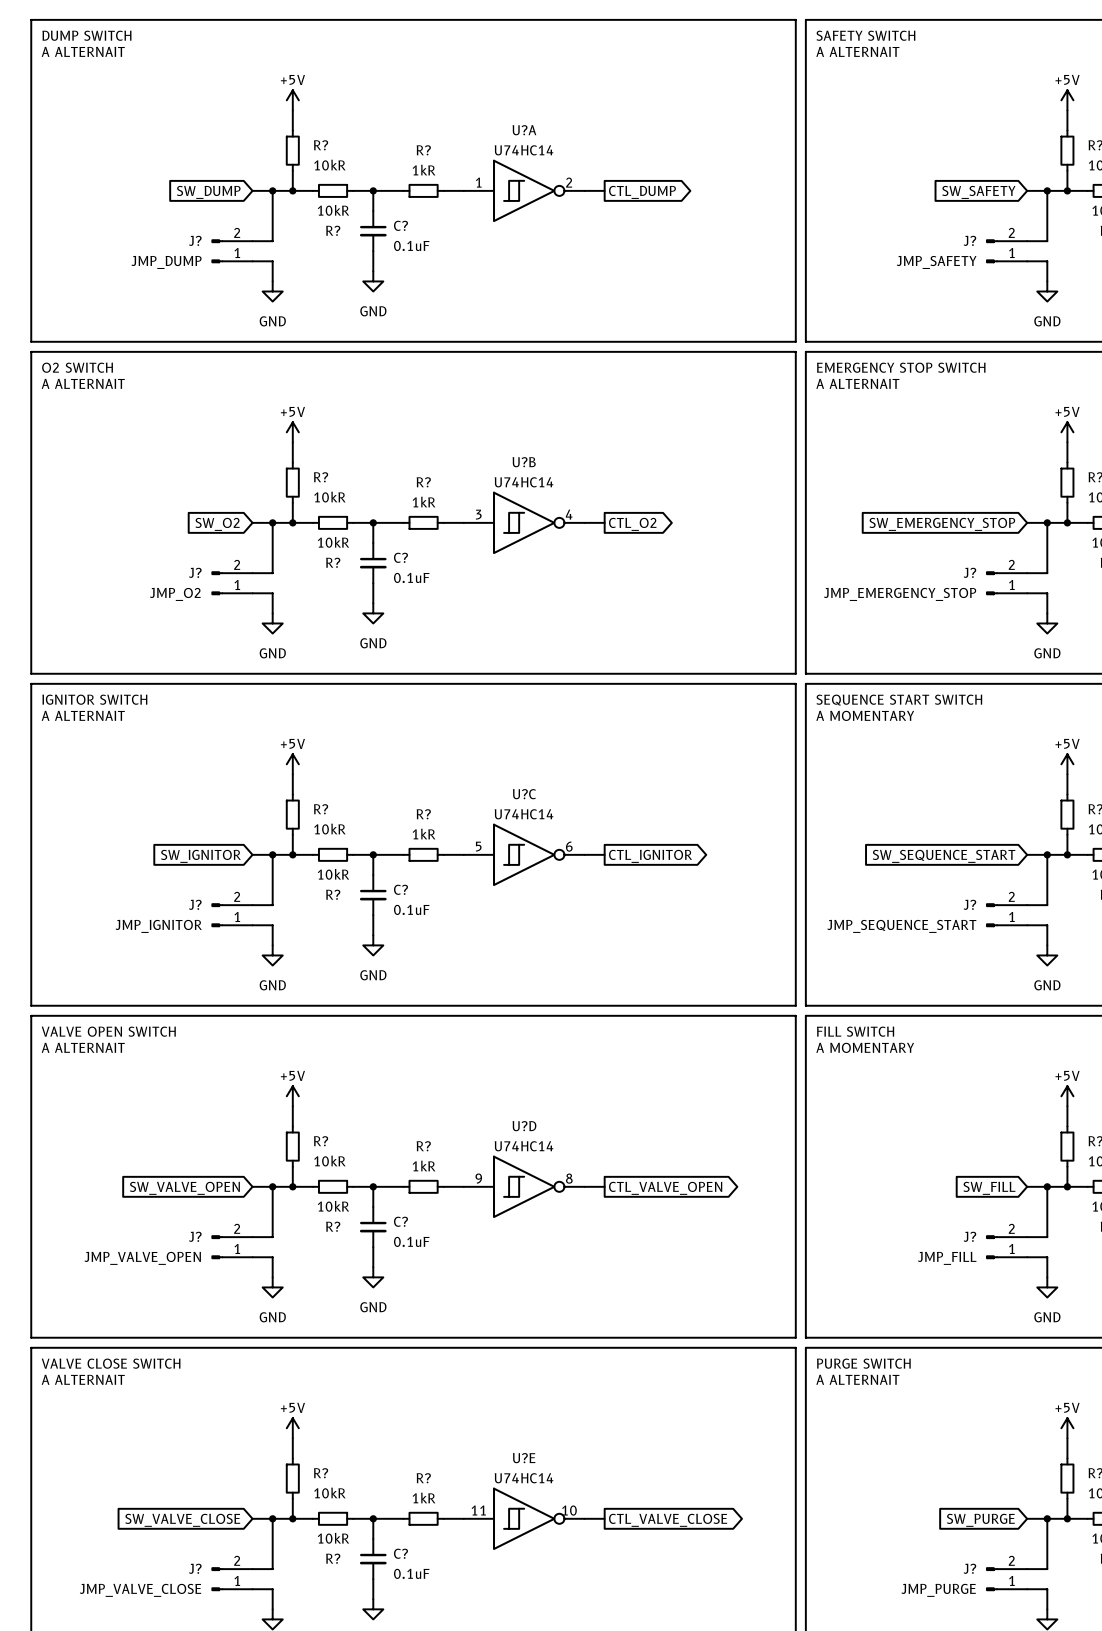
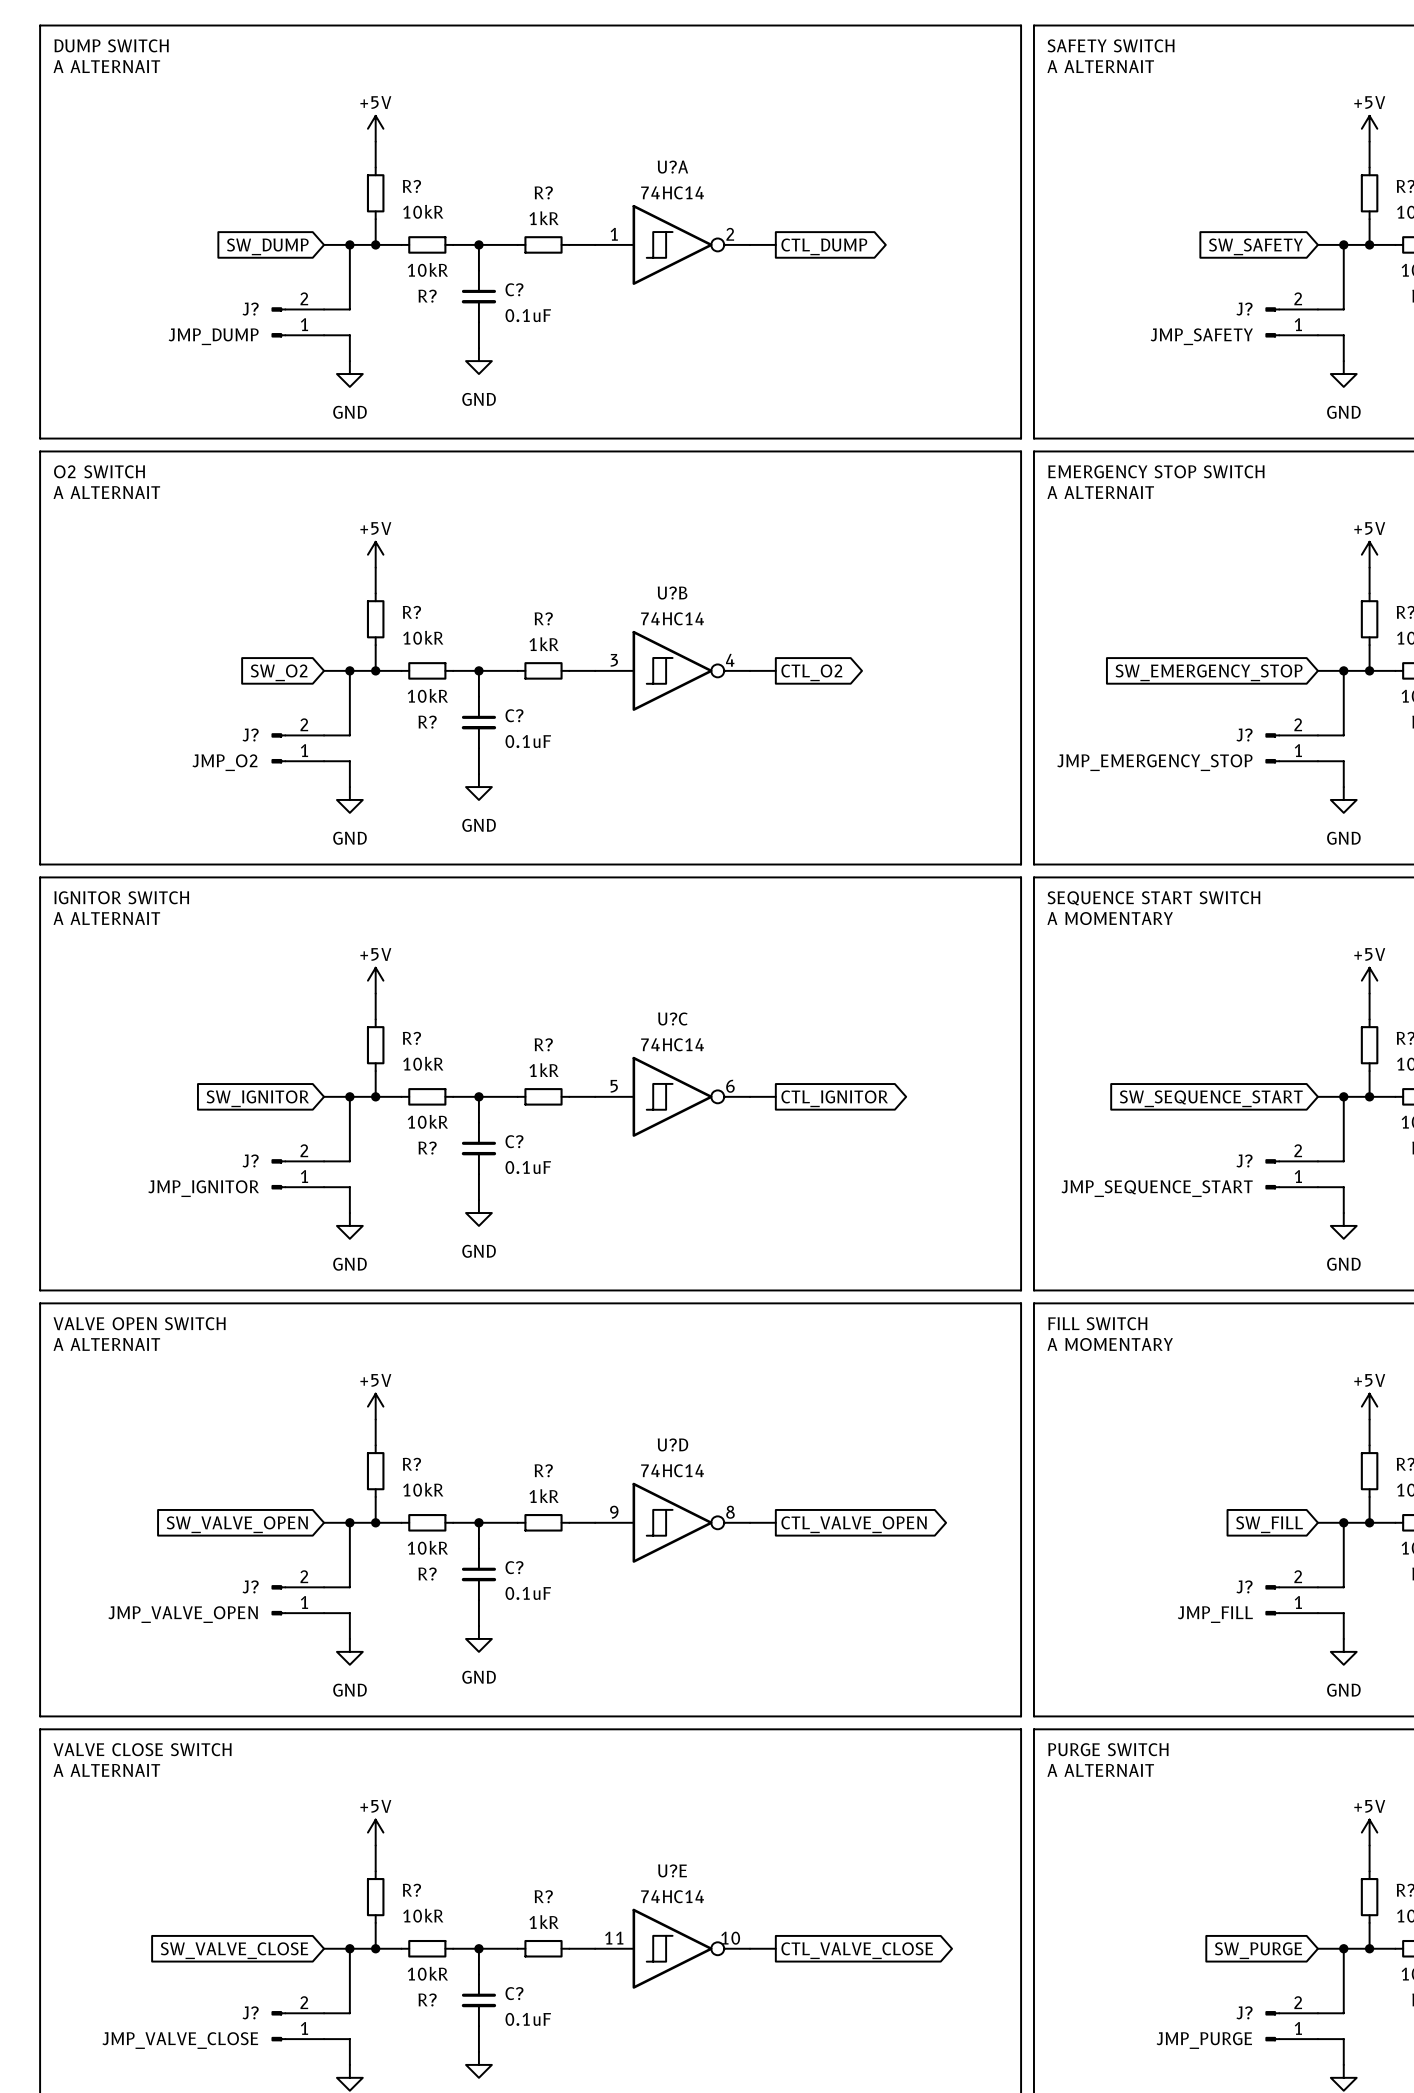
U?A value: U74HC14 (524, 150) -> 74HC14 (672, 192)
U?B value: U74HC14 (524, 482) -> 74HC14 (672, 618)
U?C value: U74HC14 (524, 814) -> 74HC14 (672, 1044)
U?D value: U74HC14 (524, 1146) -> 74HC14 (672, 1470)
U?E value: U74HC14 (524, 1478) -> 74HC14 (672, 1896)

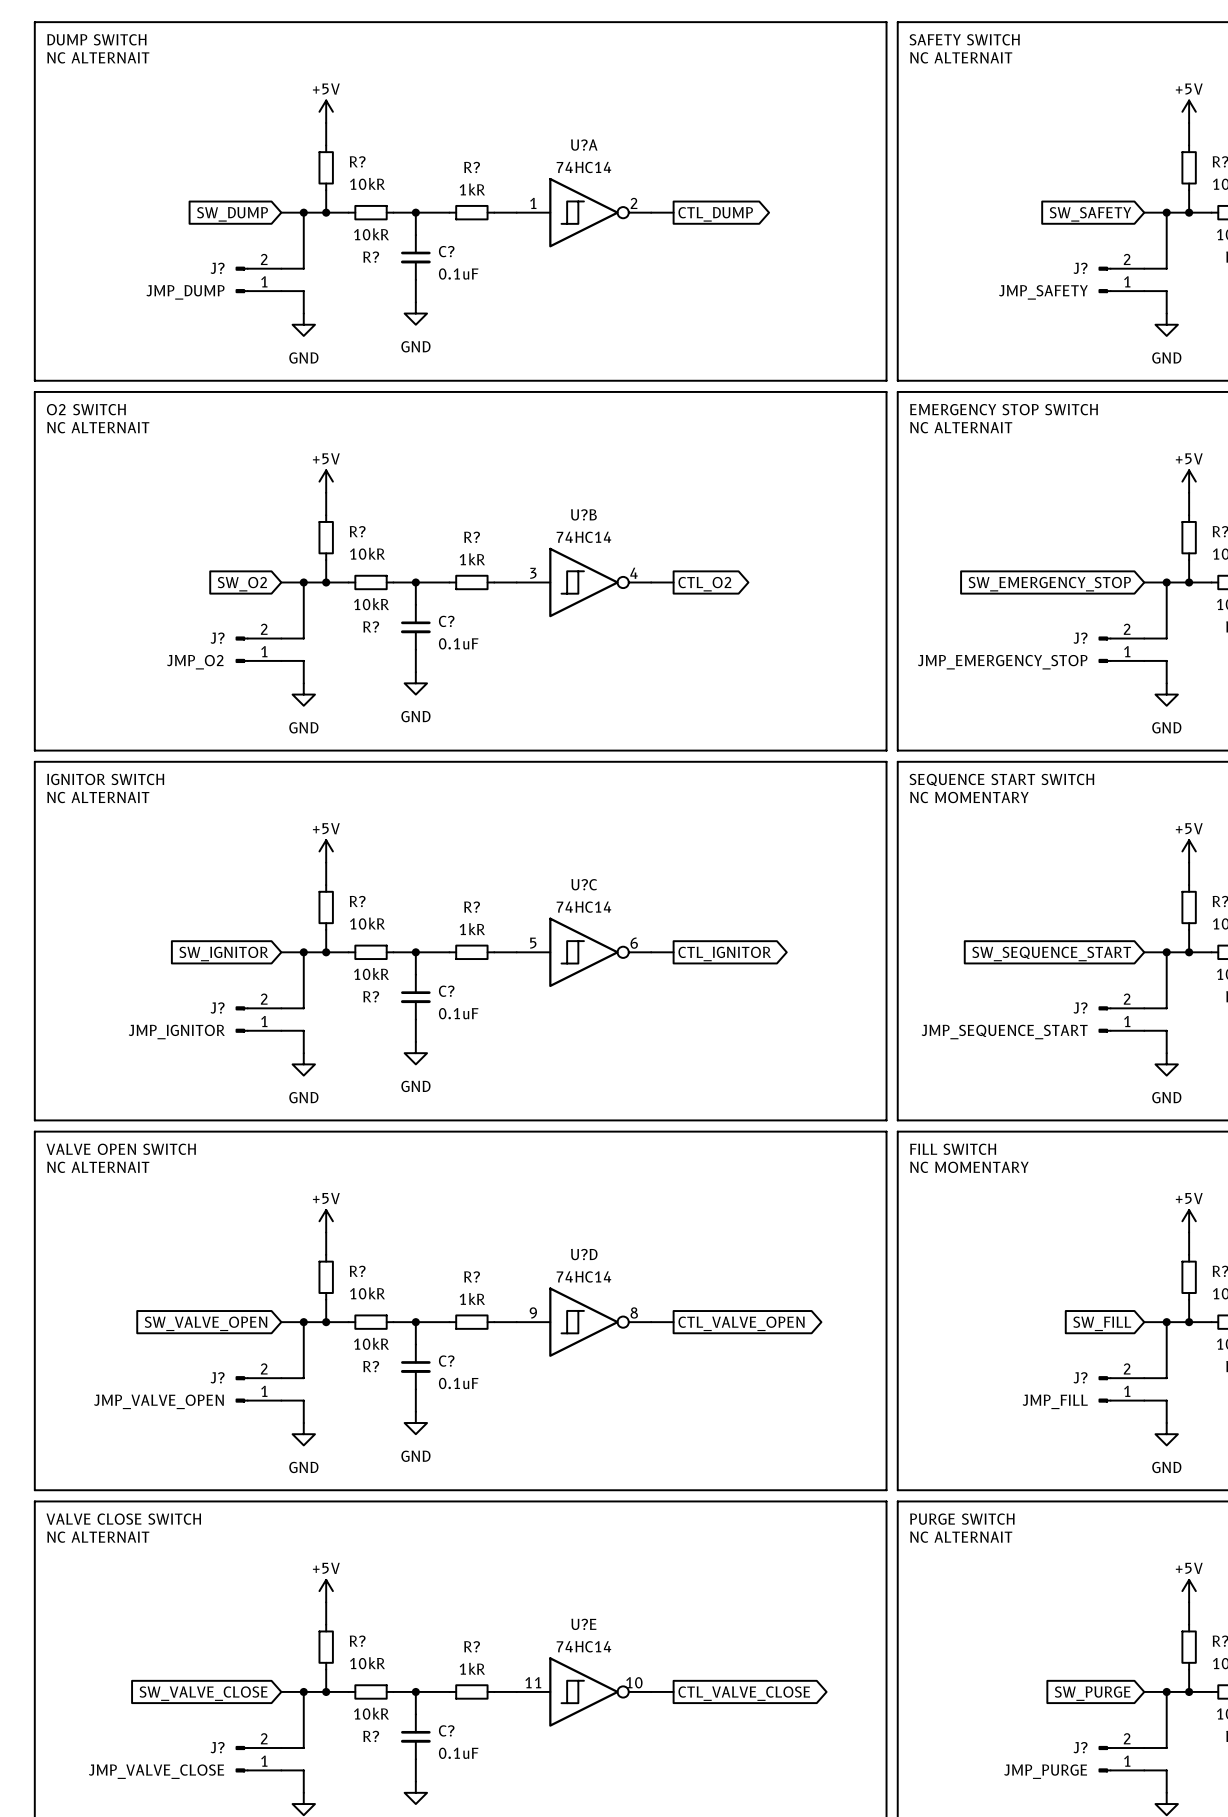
text: A ALTERNAIT (106, 66) -> NC ALTERNAIT (98, 57)
text: A ALTERNAIT (1100, 66) -> NC ALTERNAIT (961, 57)
text: A ALTERNAIT (106, 492) -> NC ALTERNAIT (98, 427)
text: A ALTERNAIT (1100, 492) -> NC ALTERNAIT (961, 427)
text: A ALTERNAIT (106, 918) -> NC ALTERNAIT (98, 797)
text: A MOMENTARY (1110, 918) -> NC MOMENTARY (969, 797)
text: A ALTERNAIT (106, 1344) -> NC ALTERNAIT (98, 1167)
text: A MOMENTARY (1110, 1344) -> NC MOMENTARY (969, 1167)
text: A ALTERNAIT (106, 1770) -> NC ALTERNAIT (98, 1537)
text: A ALTERNAIT (1100, 1770) -> NC ALTERNAIT (961, 1537)

